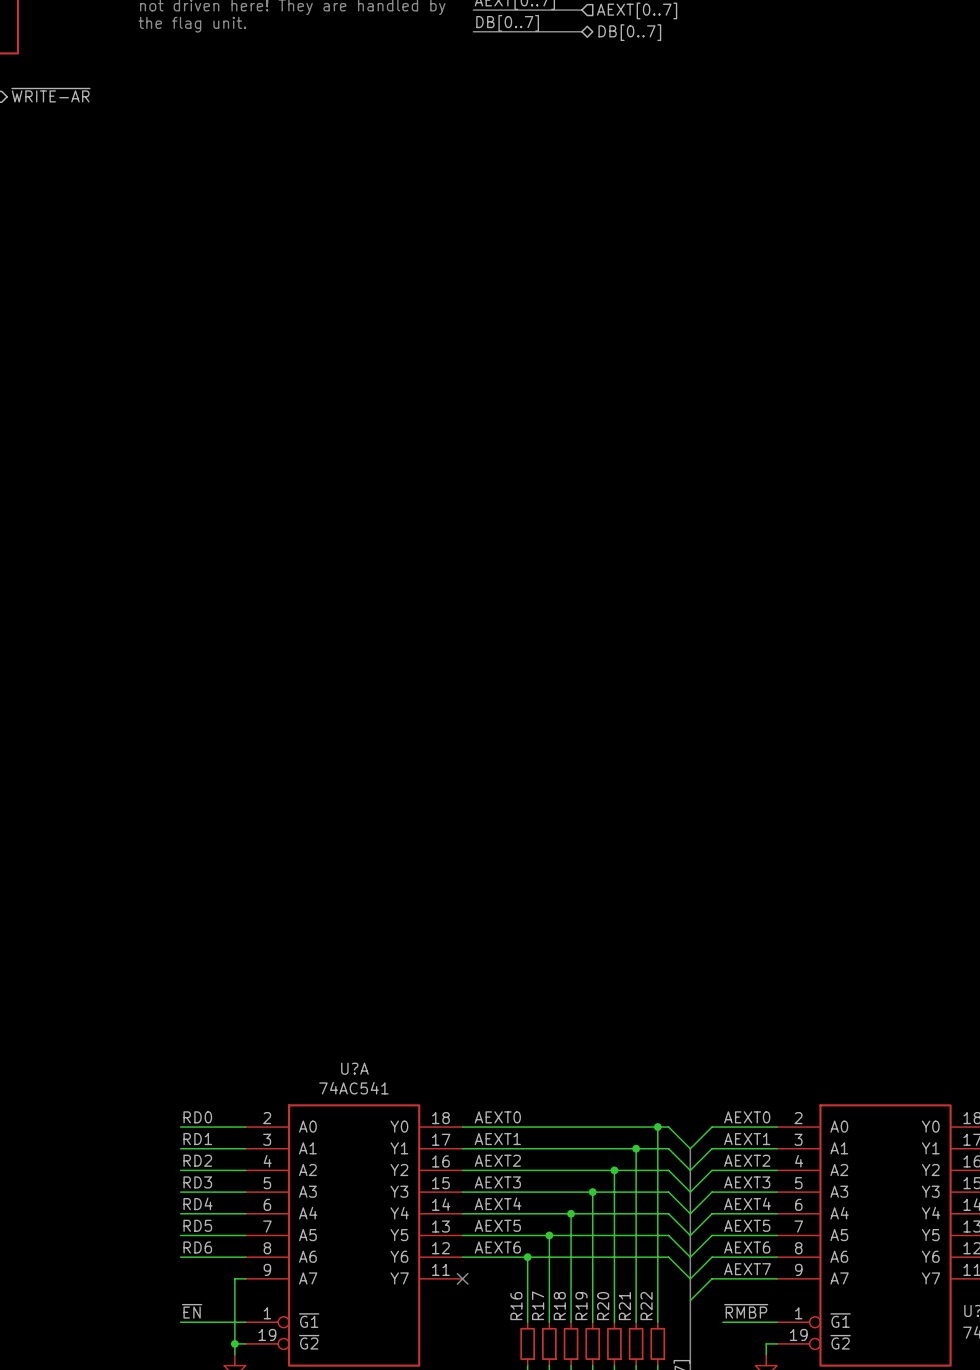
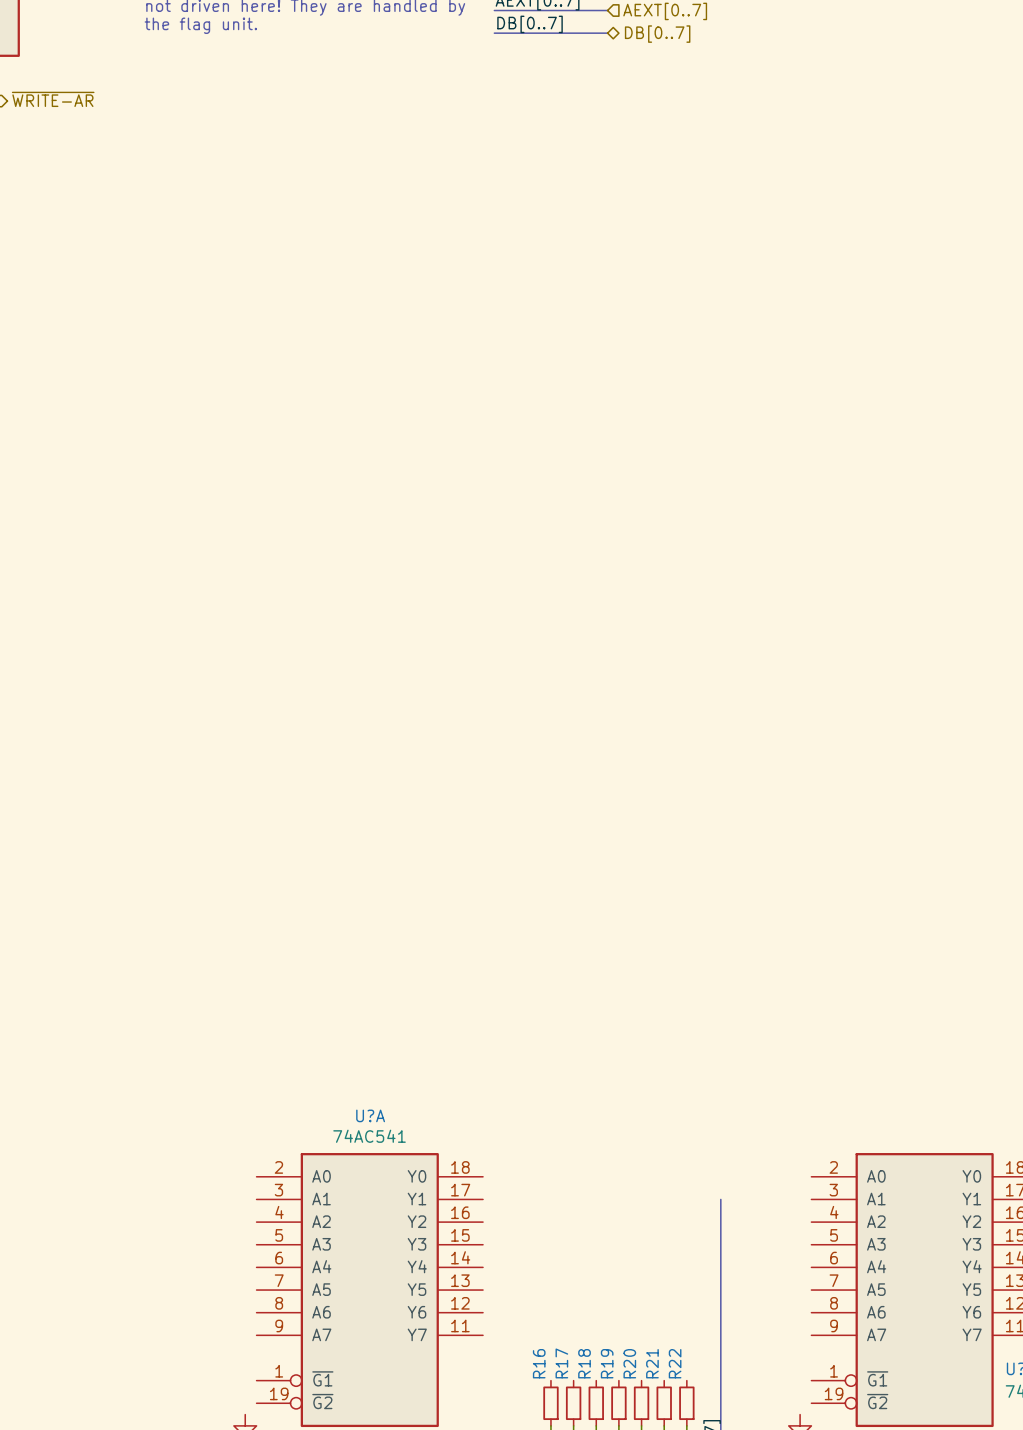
label: RD0 (197, 1117) -> none
label: AEXT0 (497, 1117) -> none
label: AEXT0 (747, 1117) -> none
wire: (180, 1127) (245, 1127) -> none
wire: (462, 1127) (668, 1127) (690, 1148) (712, 1127) (777, 1127) -> none
wire: (657, 1127) (657, 1322) -> none
junction: (657, 1127) -> none
label: RD1 (197, 1139) -> none
label: AEXT1 (497, 1139) -> none
label: AEXT1 (747, 1139) -> none
wire: (180, 1148) (245, 1148) -> none
wire: (462, 1148) (668, 1148) (690, 1170) (712, 1148) (777, 1148) -> none
wire: (636, 1148) (636, 1322) -> none
junction: (636, 1148) -> none
label: RD2 (197, 1160) -> none
label: AEXT2 (497, 1160) -> none
label: AEXT2 (747, 1160) -> none
wire: (180, 1170) (245, 1170) -> none
wire: (462, 1170) (668, 1170) (690, 1192) (712, 1170) (777, 1170) -> none
wire: (614, 1170) (614, 1322) -> none
junction: (614, 1170) -> none
label: RD3 (197, 1182) -> none
label: AEXT3 (497, 1182) -> none
label: AEXT3 (747, 1182) -> none
wire: (180, 1192) (245, 1192) -> none
wire: (462, 1192) (668, 1192) (690, 1213) (712, 1192) (777, 1192) -> none
wire: (592, 1192) (592, 1322) -> none
junction: (592, 1192) -> none
label: RD4 (198, 1203) -> none
label: AEXT4 (498, 1203) -> none
label: AEXT4 (747, 1203) -> none
wire: (180, 1213) (245, 1213) -> none
wire: (462, 1213) (668, 1213) (690, 1235) (712, 1213) (777, 1213) -> none
wire: (571, 1213) (571, 1322) -> none
junction: (571, 1213) -> none
label: RD5 (197, 1225) -> none
label: AEXT5 (497, 1225) -> none
label: AEXT5 (747, 1225) -> none
wire: (180, 1235) (245, 1235) -> none
wire: (462, 1235) (668, 1235) (690, 1257) (712, 1235) (777, 1235) -> none
wire: (549, 1235) (549, 1322) -> none
junction: (549, 1235) -> none
label: RD6 (197, 1247) -> none
label: AEXT6 (497, 1247) -> none
label: AEXT6 (747, 1247) -> none
wire: (180, 1257) (245, 1257) -> none
wire: (462, 1257) (668, 1257) (690, 1278) (712, 1257) (777, 1257) -> none
wire: (527, 1257) (527, 1322) -> none
junction: (527, 1257) -> none
label: AEXT7 (747, 1269) -> none
wire: (245, 1278) (234, 1278) (234, 1354) -> none
no-connect mark: (462, 1278) -> none
wire: (777, 1278) (712, 1278) (690, 1300) -> none
label: ~{EN} (192, 1311) -> none
label: ~{RMBP} (746, 1311) -> none
wire: (180, 1322) (245, 1322) -> none
wire: (722, 1322) (777, 1322) -> none
wire: (234, 1343) (245, 1343) -> none
junction: (234, 1343) -> none
wire: (777, 1343) (766, 1343) (766, 1354) -> none

